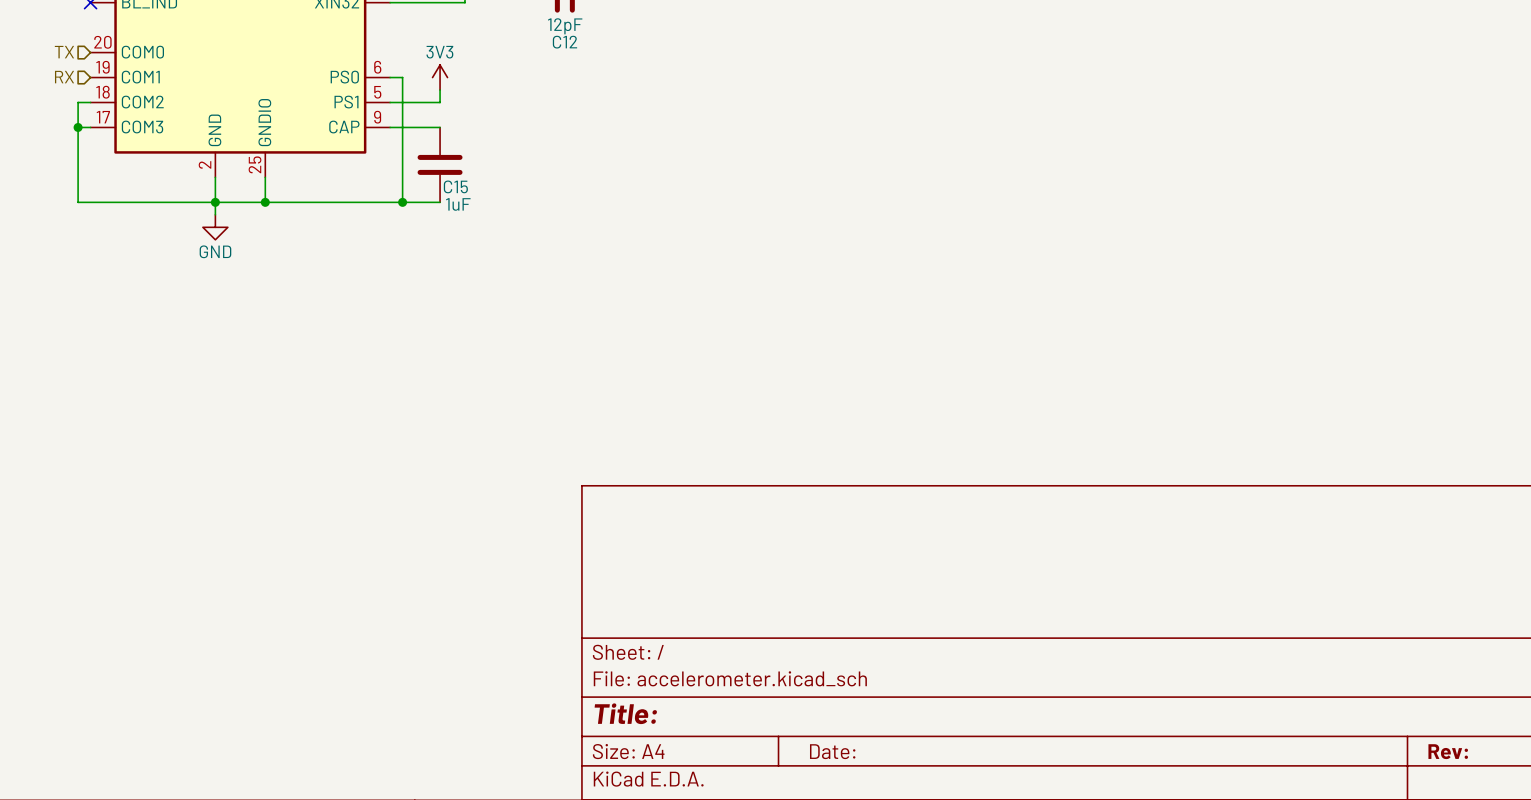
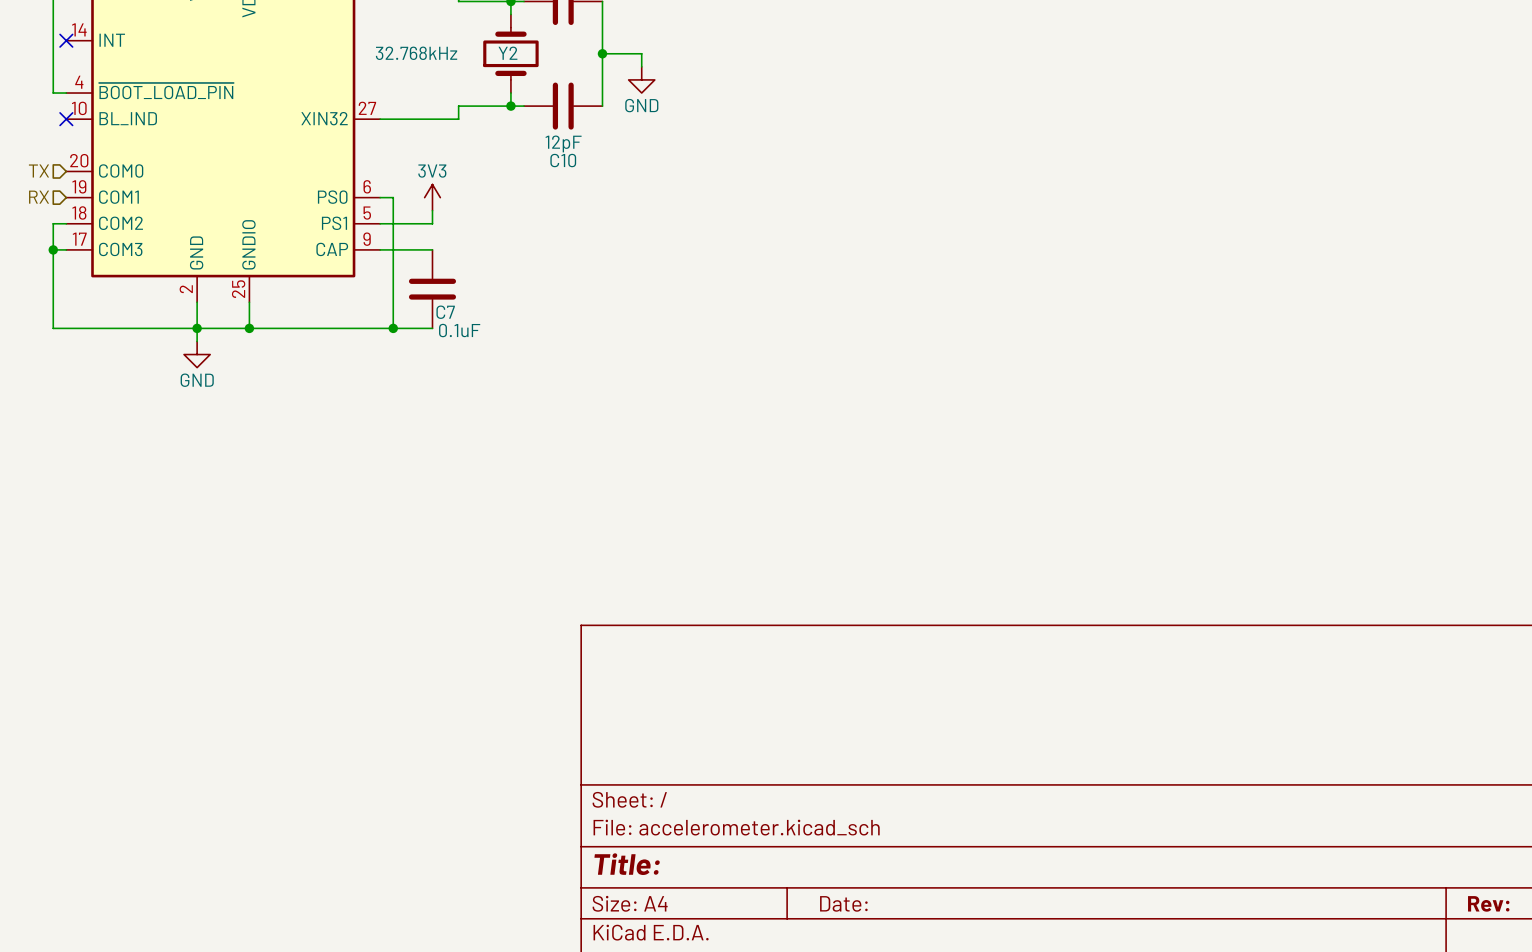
C12 name: C12 (564, 42) -> C10 (563, 160)
C15 name: C15 (455, 186) -> C7 (445, 312)
C15 value: 1uF (458, 204) -> 0.1uF (459, 330)

